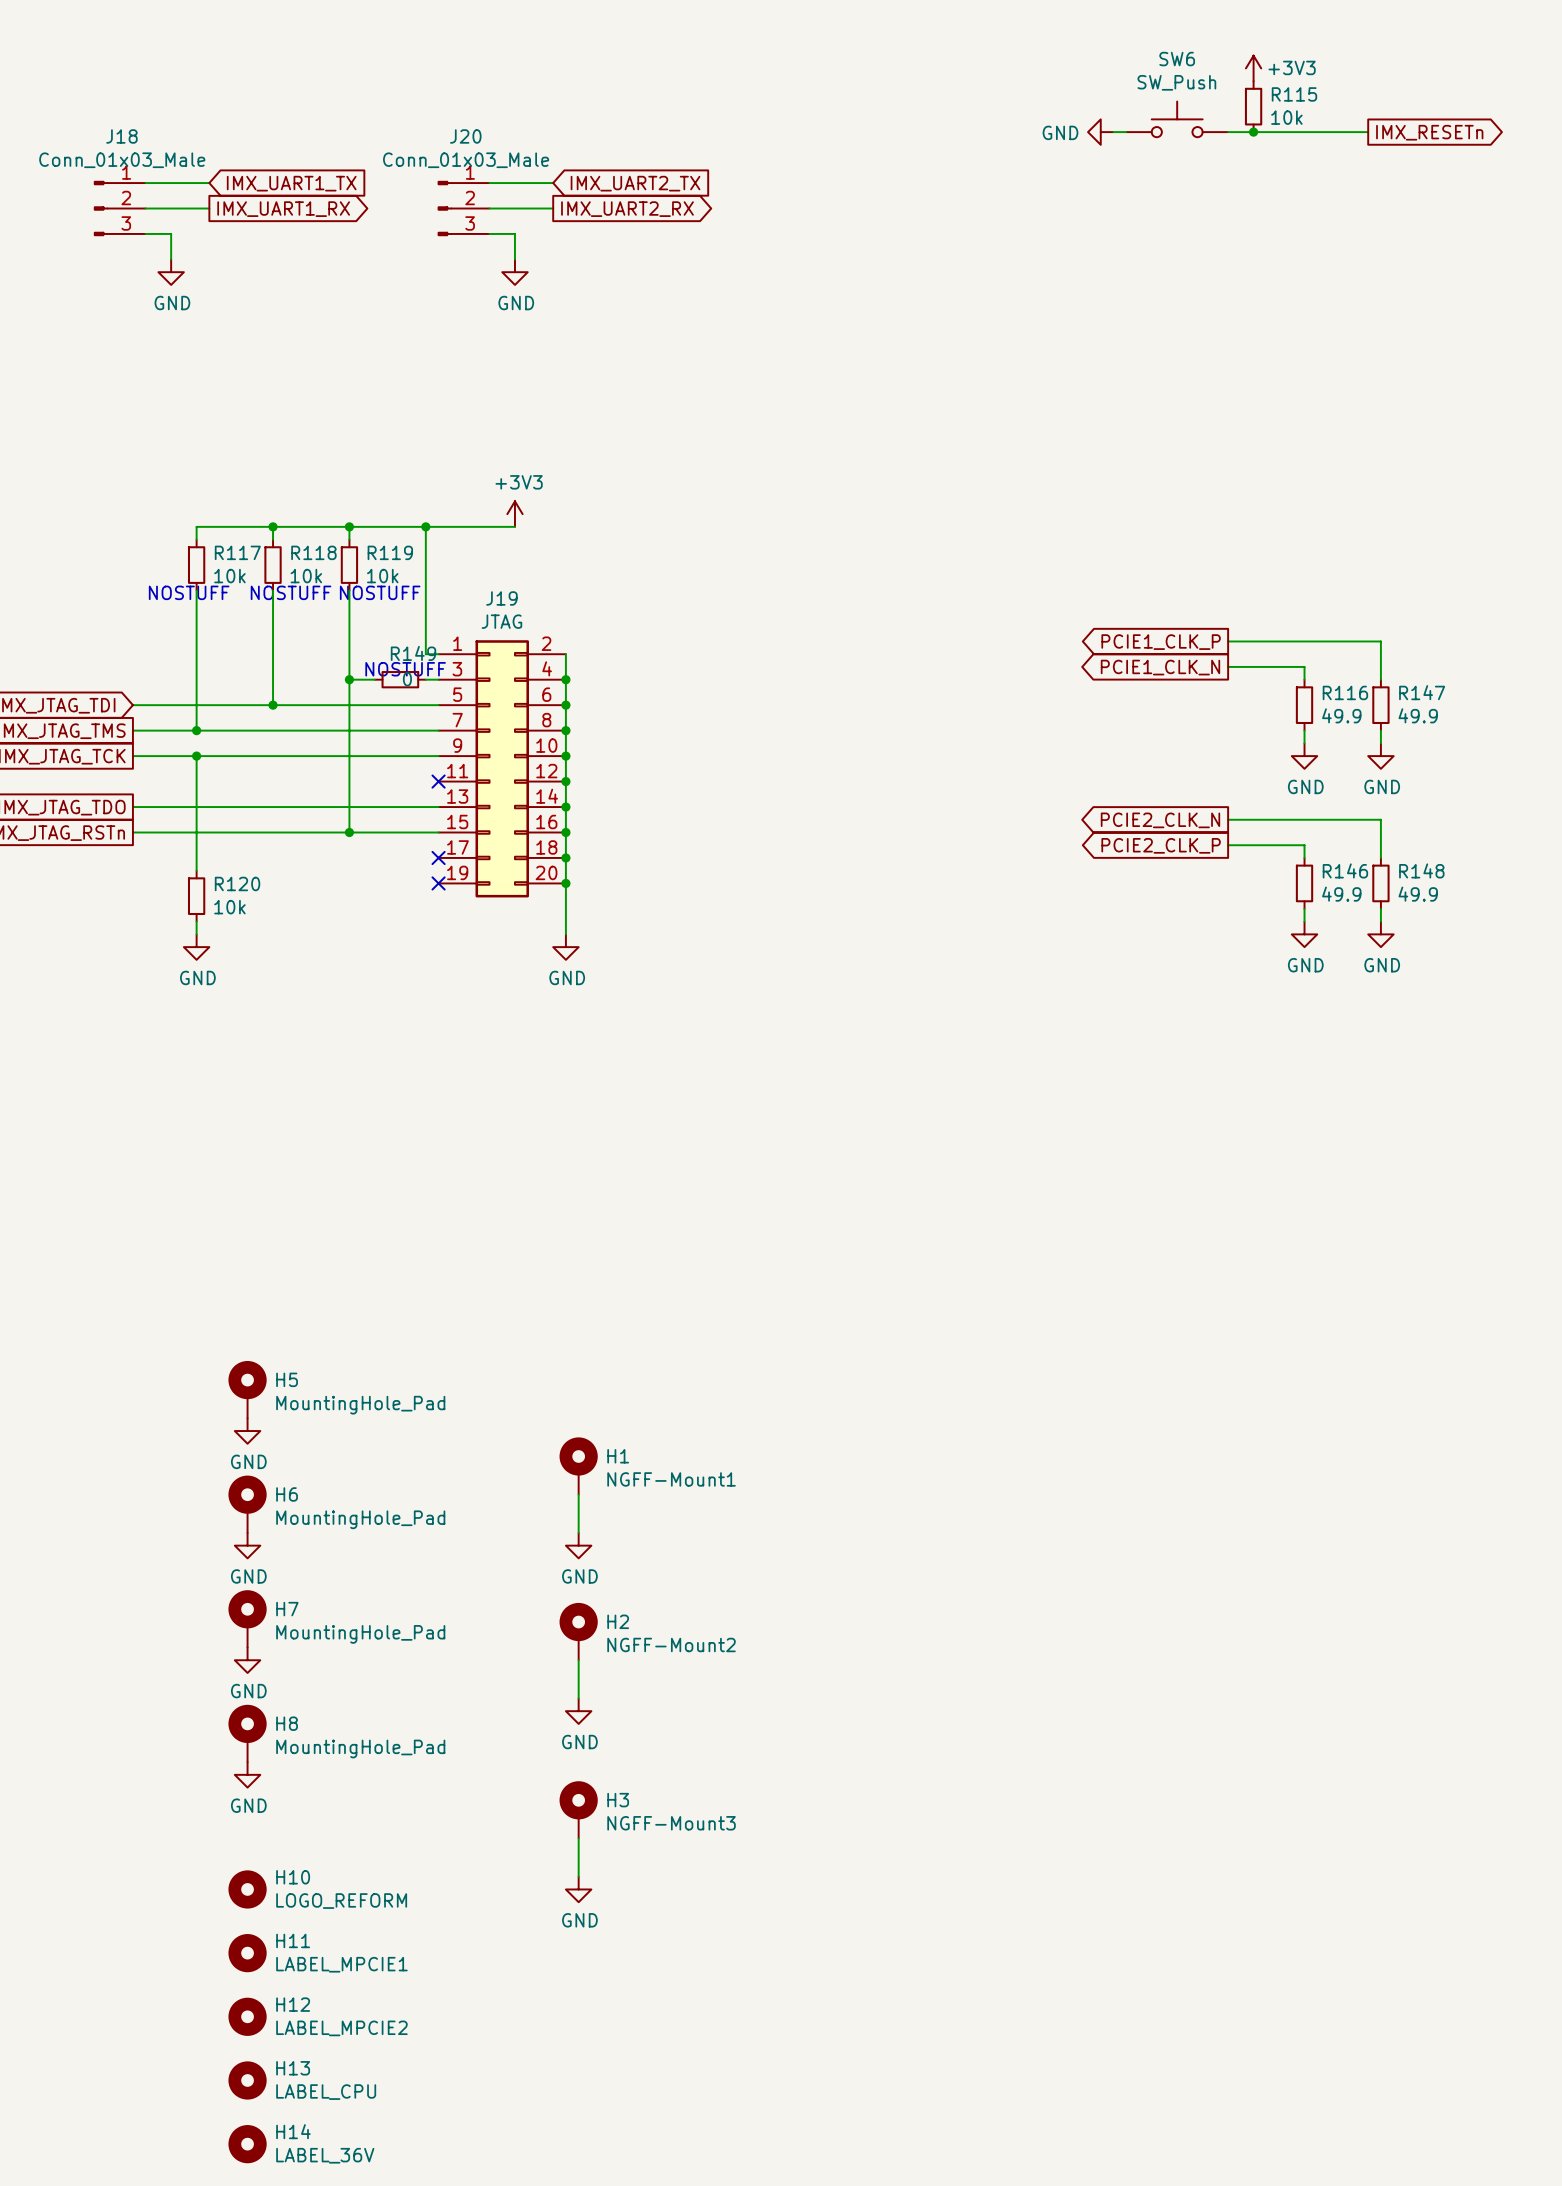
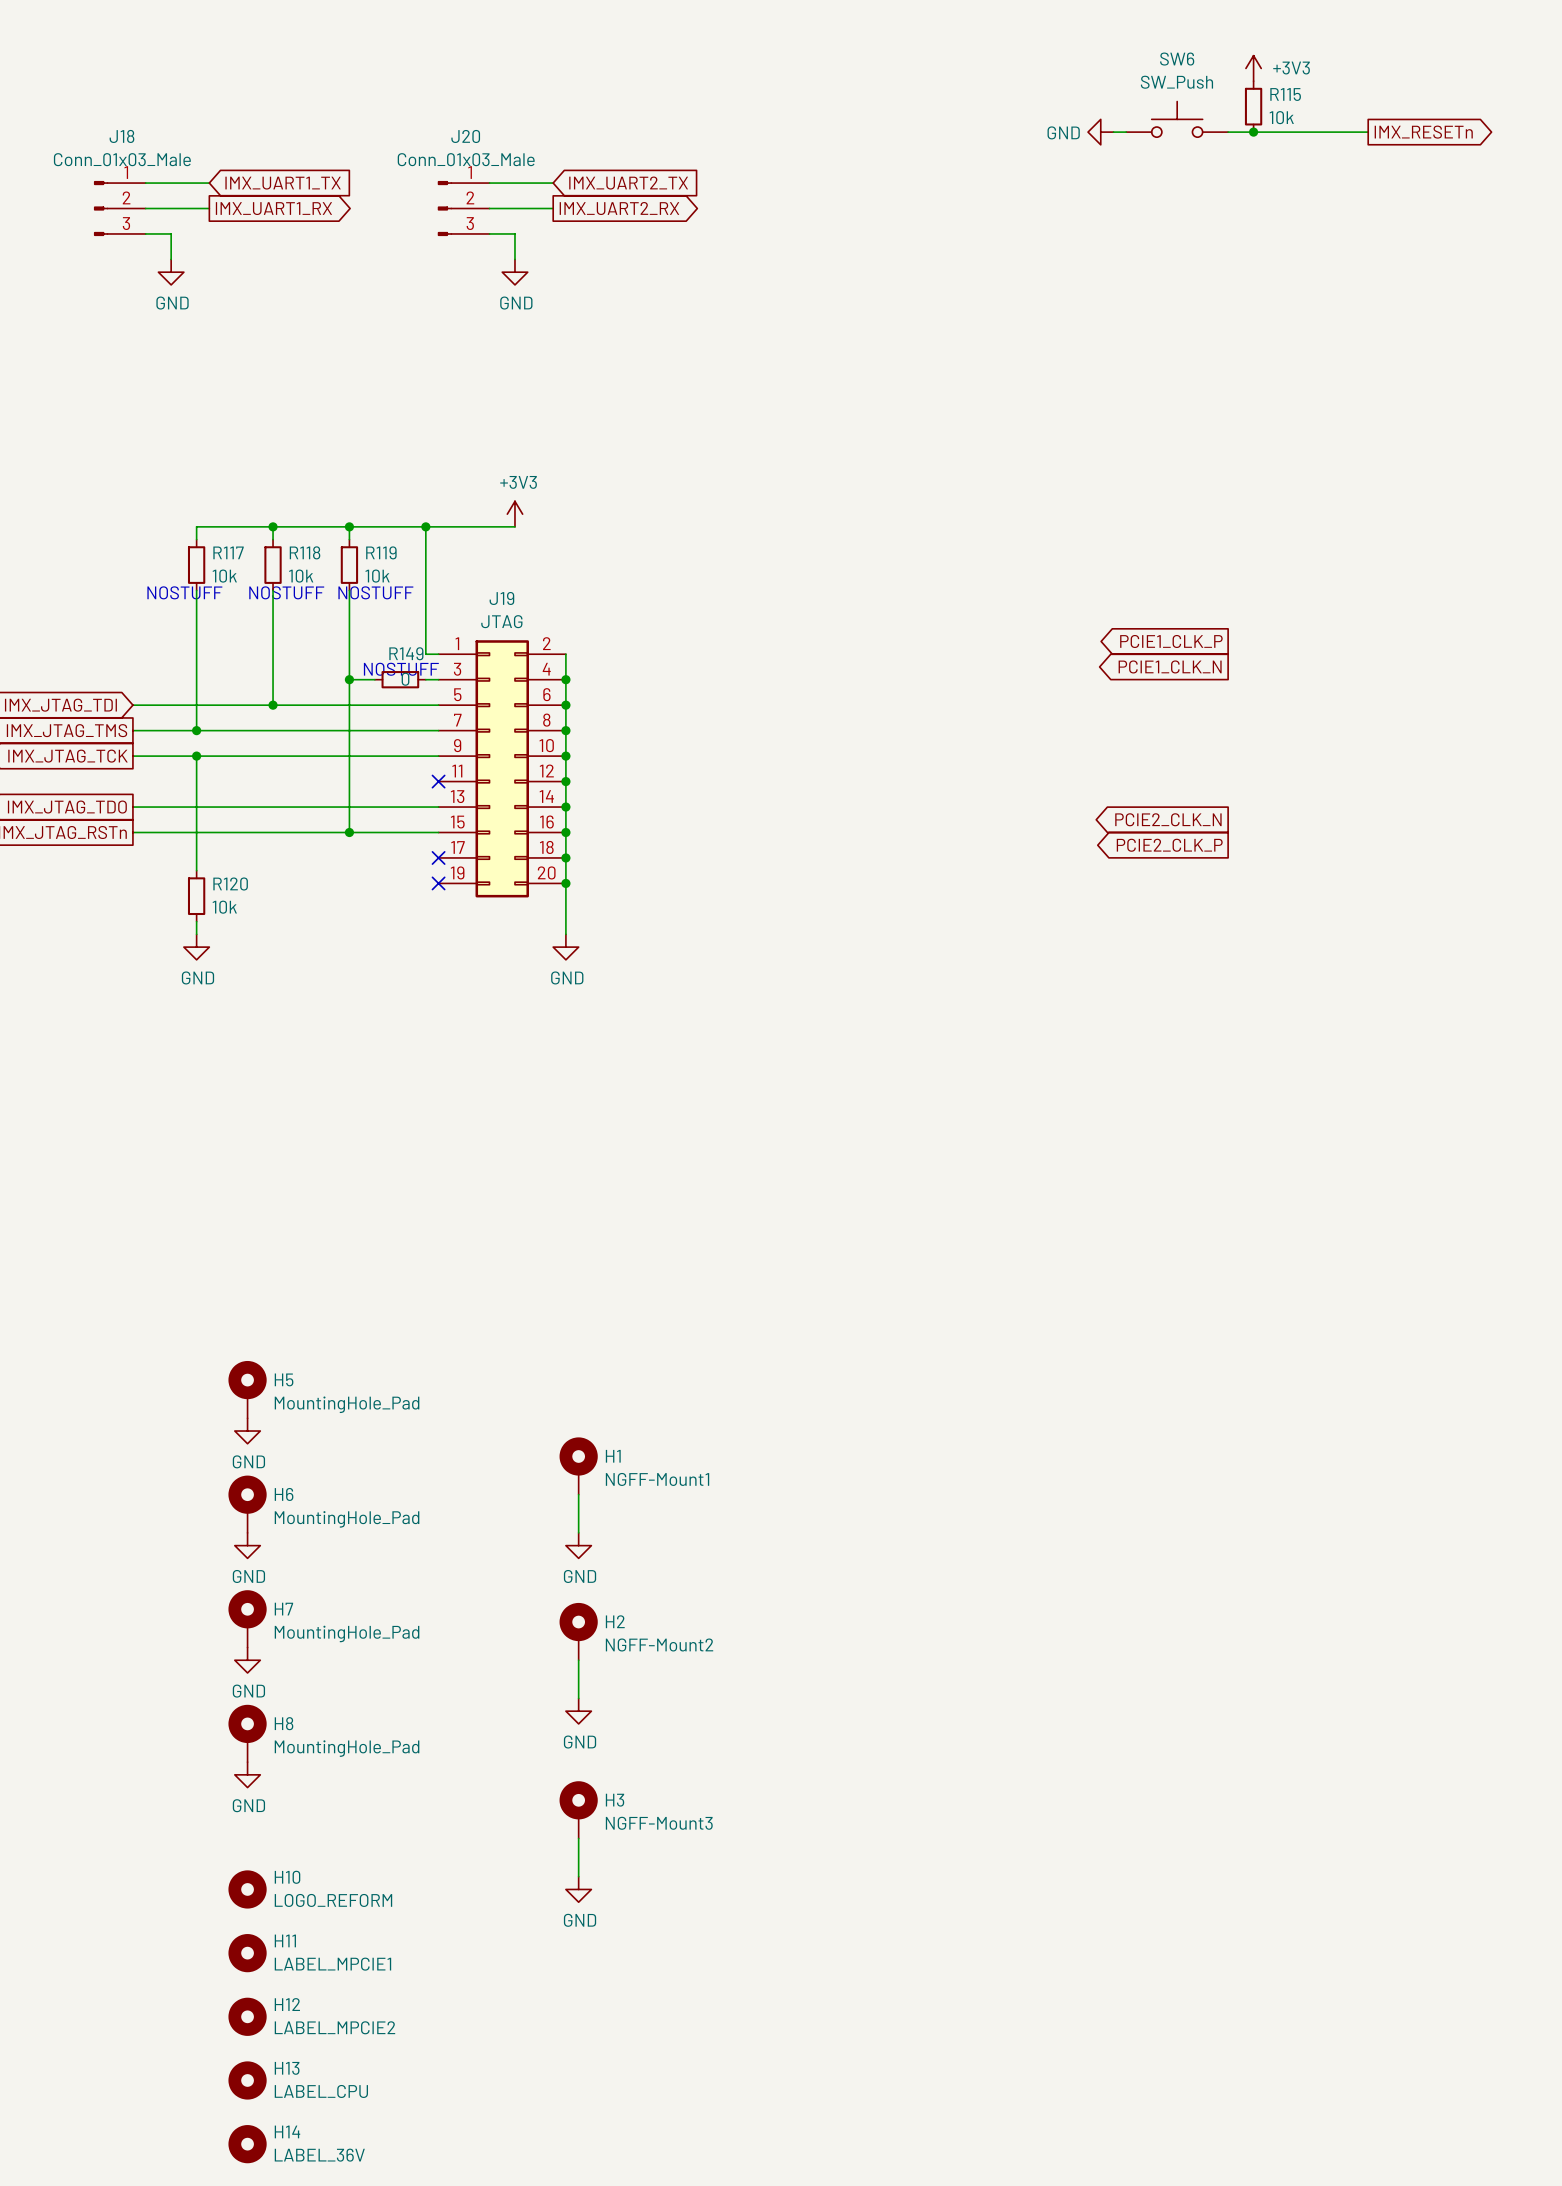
wire: (1228, 641) (1380, 641) (1380, 679) -> none
wire: (1228, 666) (1304, 666) (1304, 679) -> none
R116: 49.9 (1304, 705) -> none
R147: 49.9 (1380, 705) -> none
wire: (1304, 730) (1304, 743) -> none
wire: (1380, 730) (1380, 743) -> none
power symbol: GND (1304, 756) -> none
power symbol: GND (1380, 756) -> none
wire: (1228, 819) (1380, 819) (1380, 857) -> none
wire: (1228, 845) (1304, 845) (1304, 857) -> none
R146: 49.9 (1304, 883) -> none
R148: 49.9 (1380, 883) -> none
wire: (1304, 908) (1304, 921) -> none
wire: (1380, 908) (1380, 921) -> none
power symbol: GND (1304, 934) -> none
power symbol: GND (1380, 934) -> none

